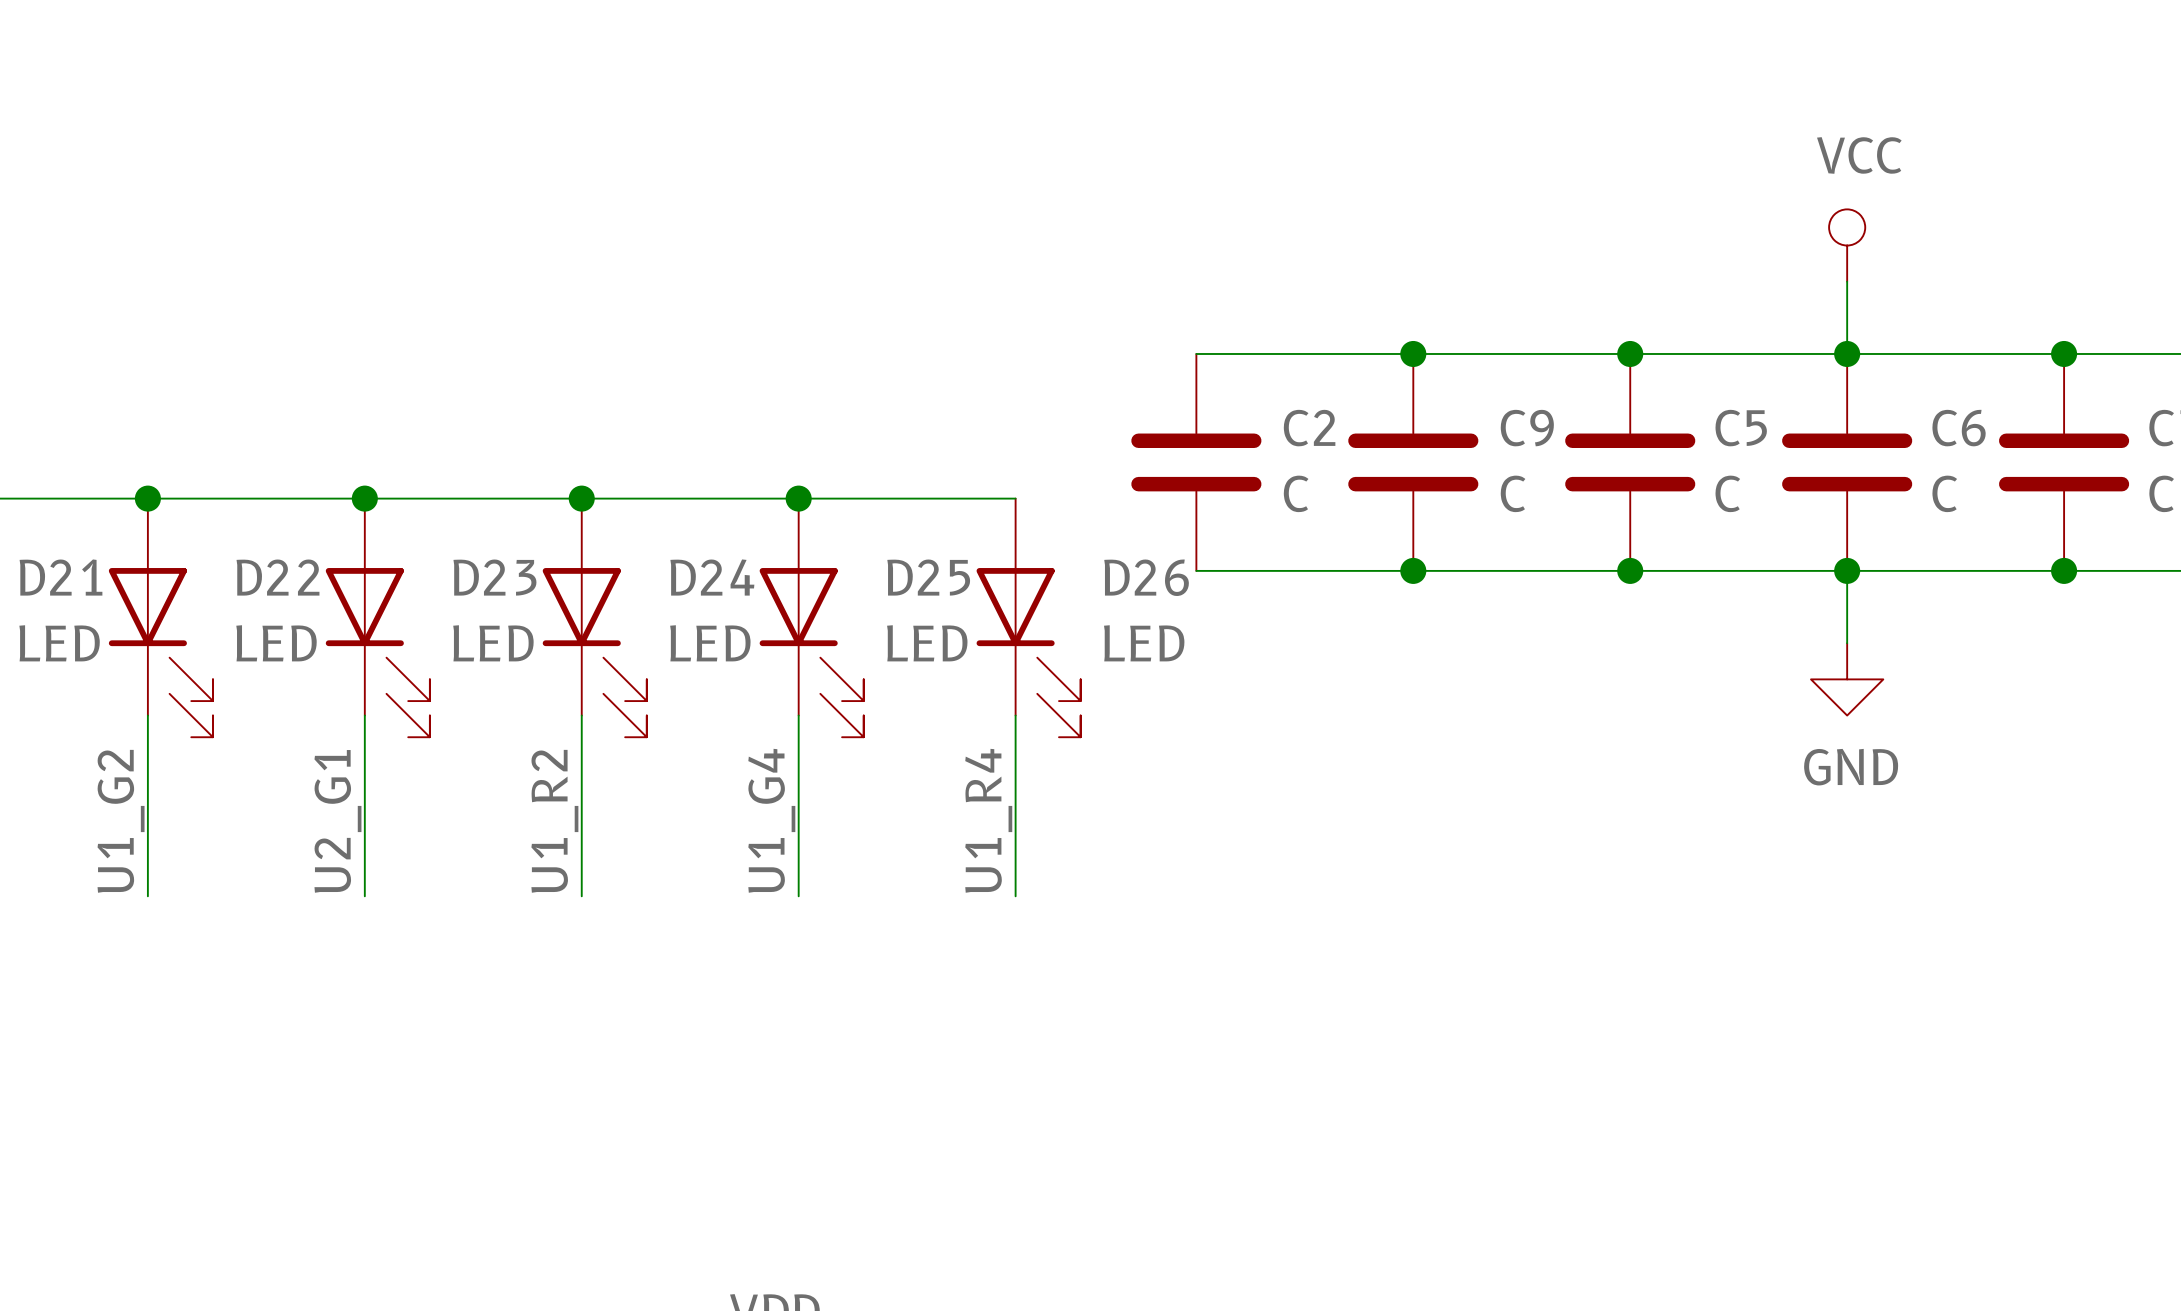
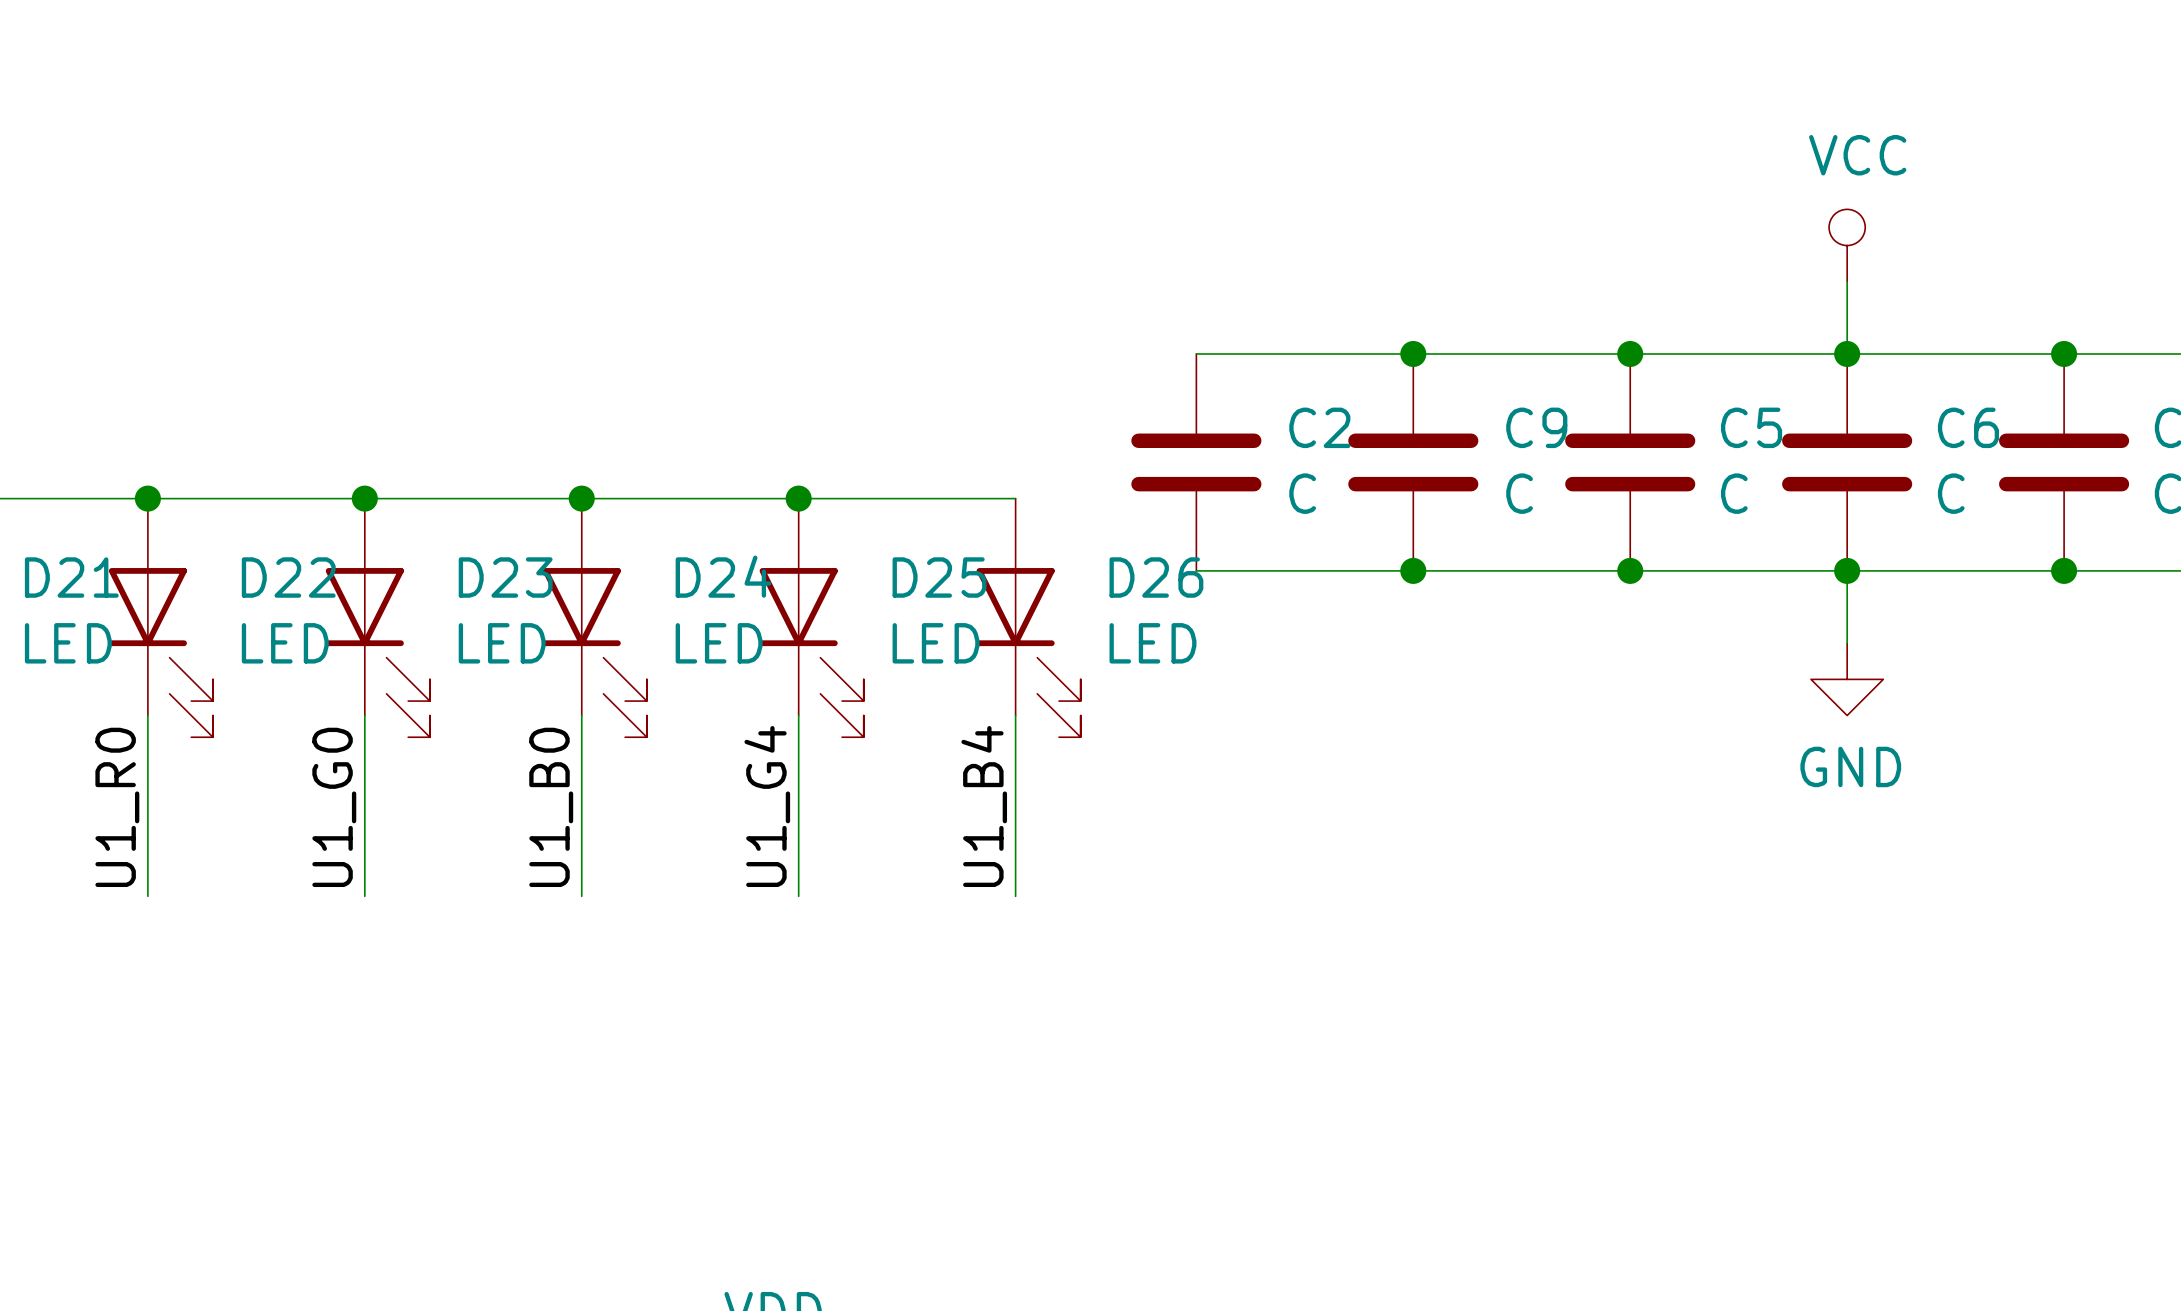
label: U1_R4 (988, 820) -> U1_B4 (984, 806)
label: U1_G2 (121, 821) -> U1_R0 (117, 807)
label: U2_G1 (337, 821) -> U1_G0 (334, 807)
label: U1_R2 (554, 821) -> U1_B0 (551, 807)

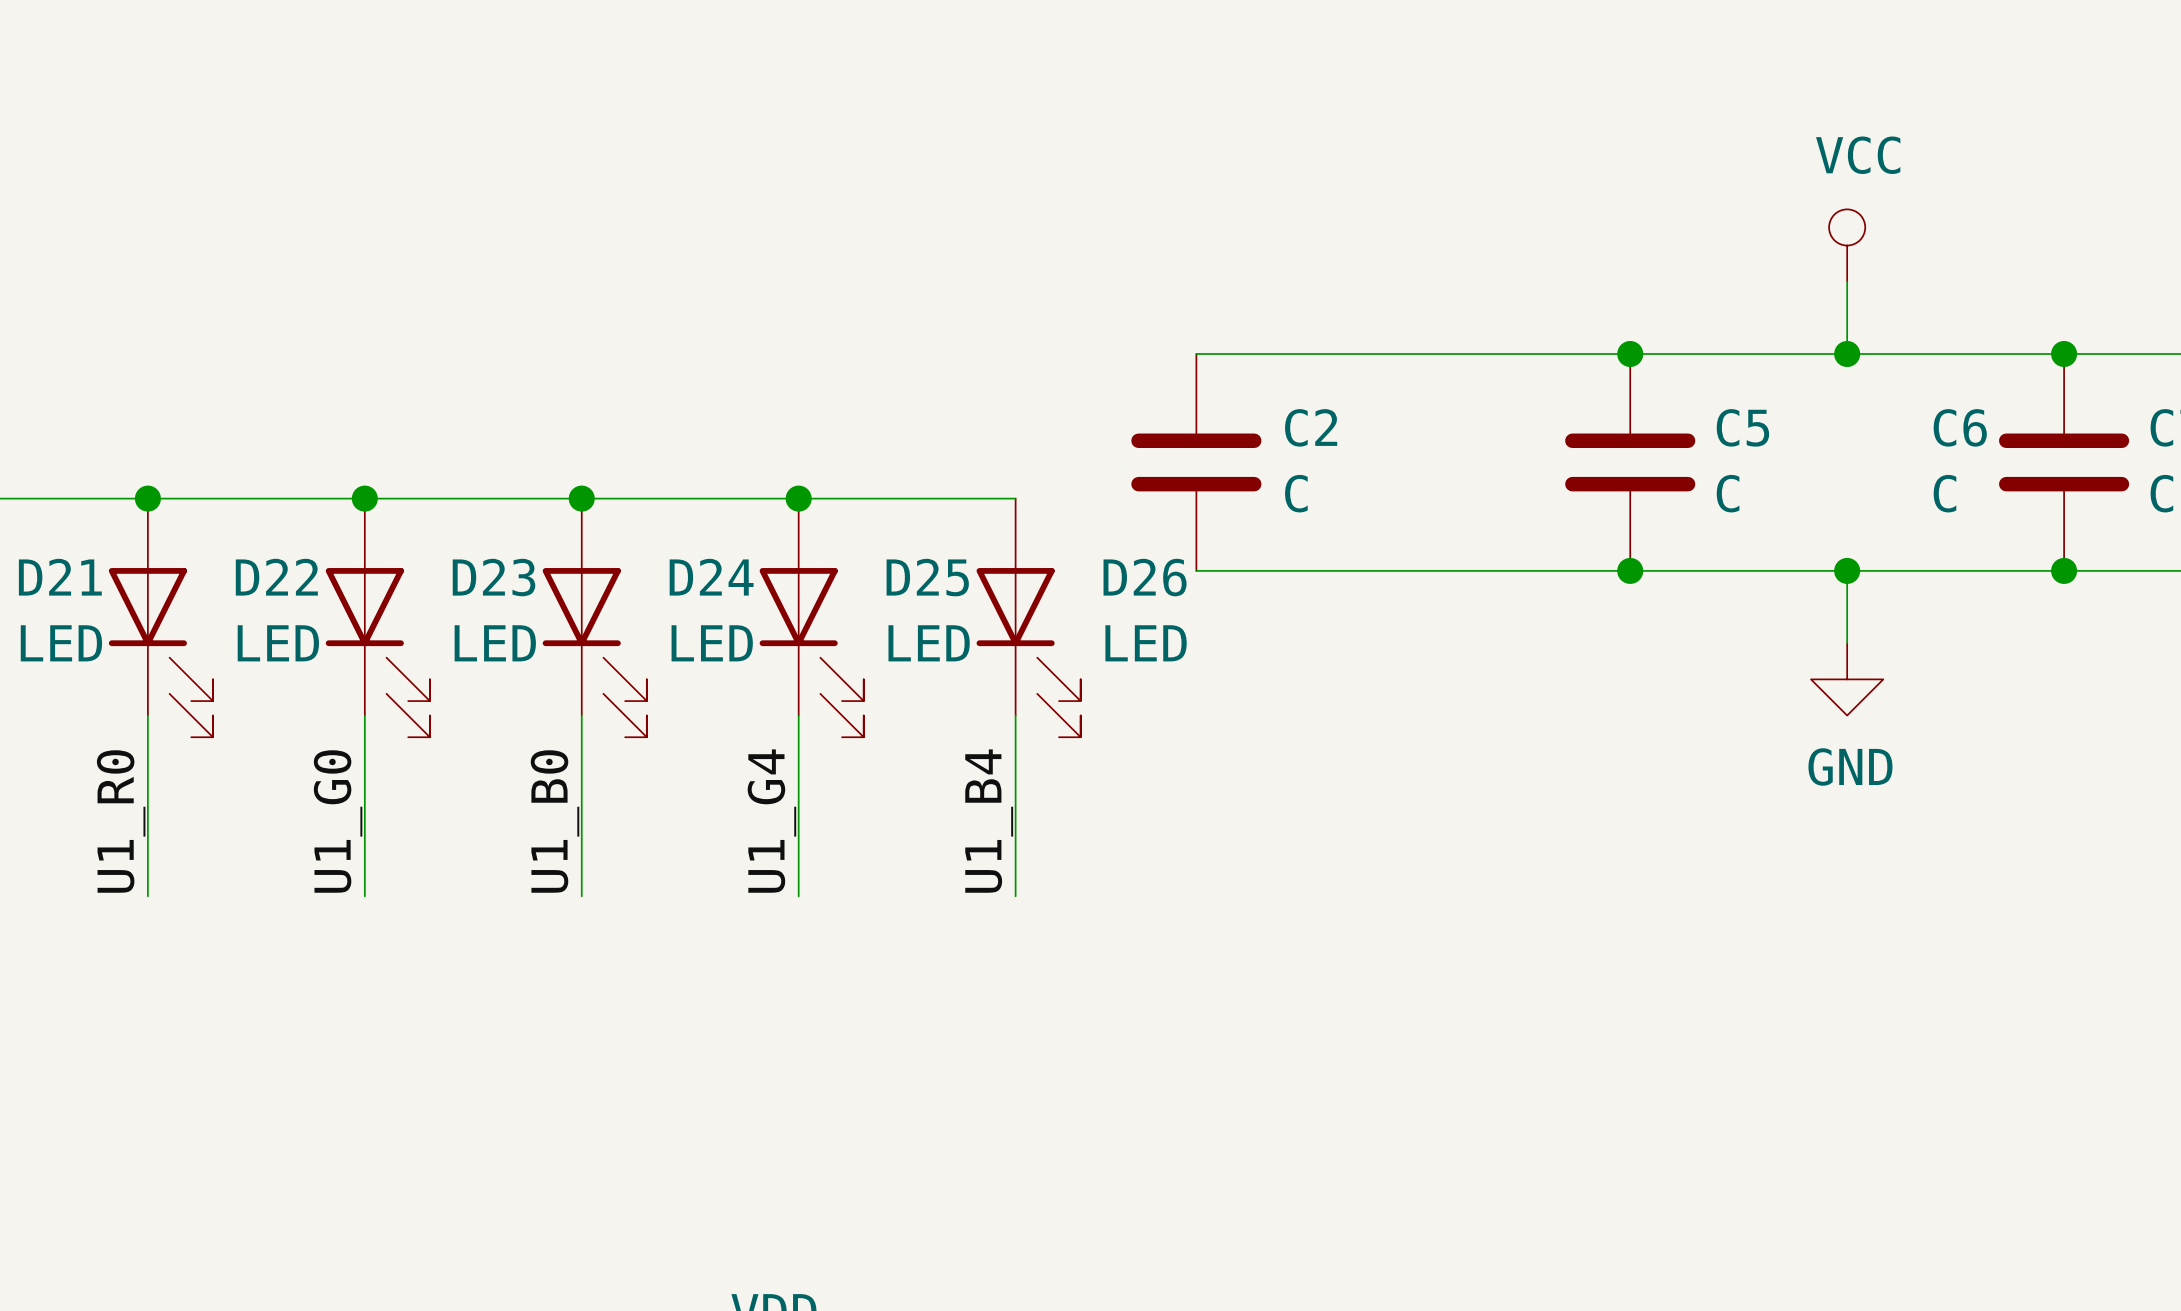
junction: (1413, 353) -> none
C6 symbol: [1782, 353, 1913, 571] -> [1933, 409, 1987, 513]
C9: C (1413, 462) -> none
junction: (1413, 570) -> none

